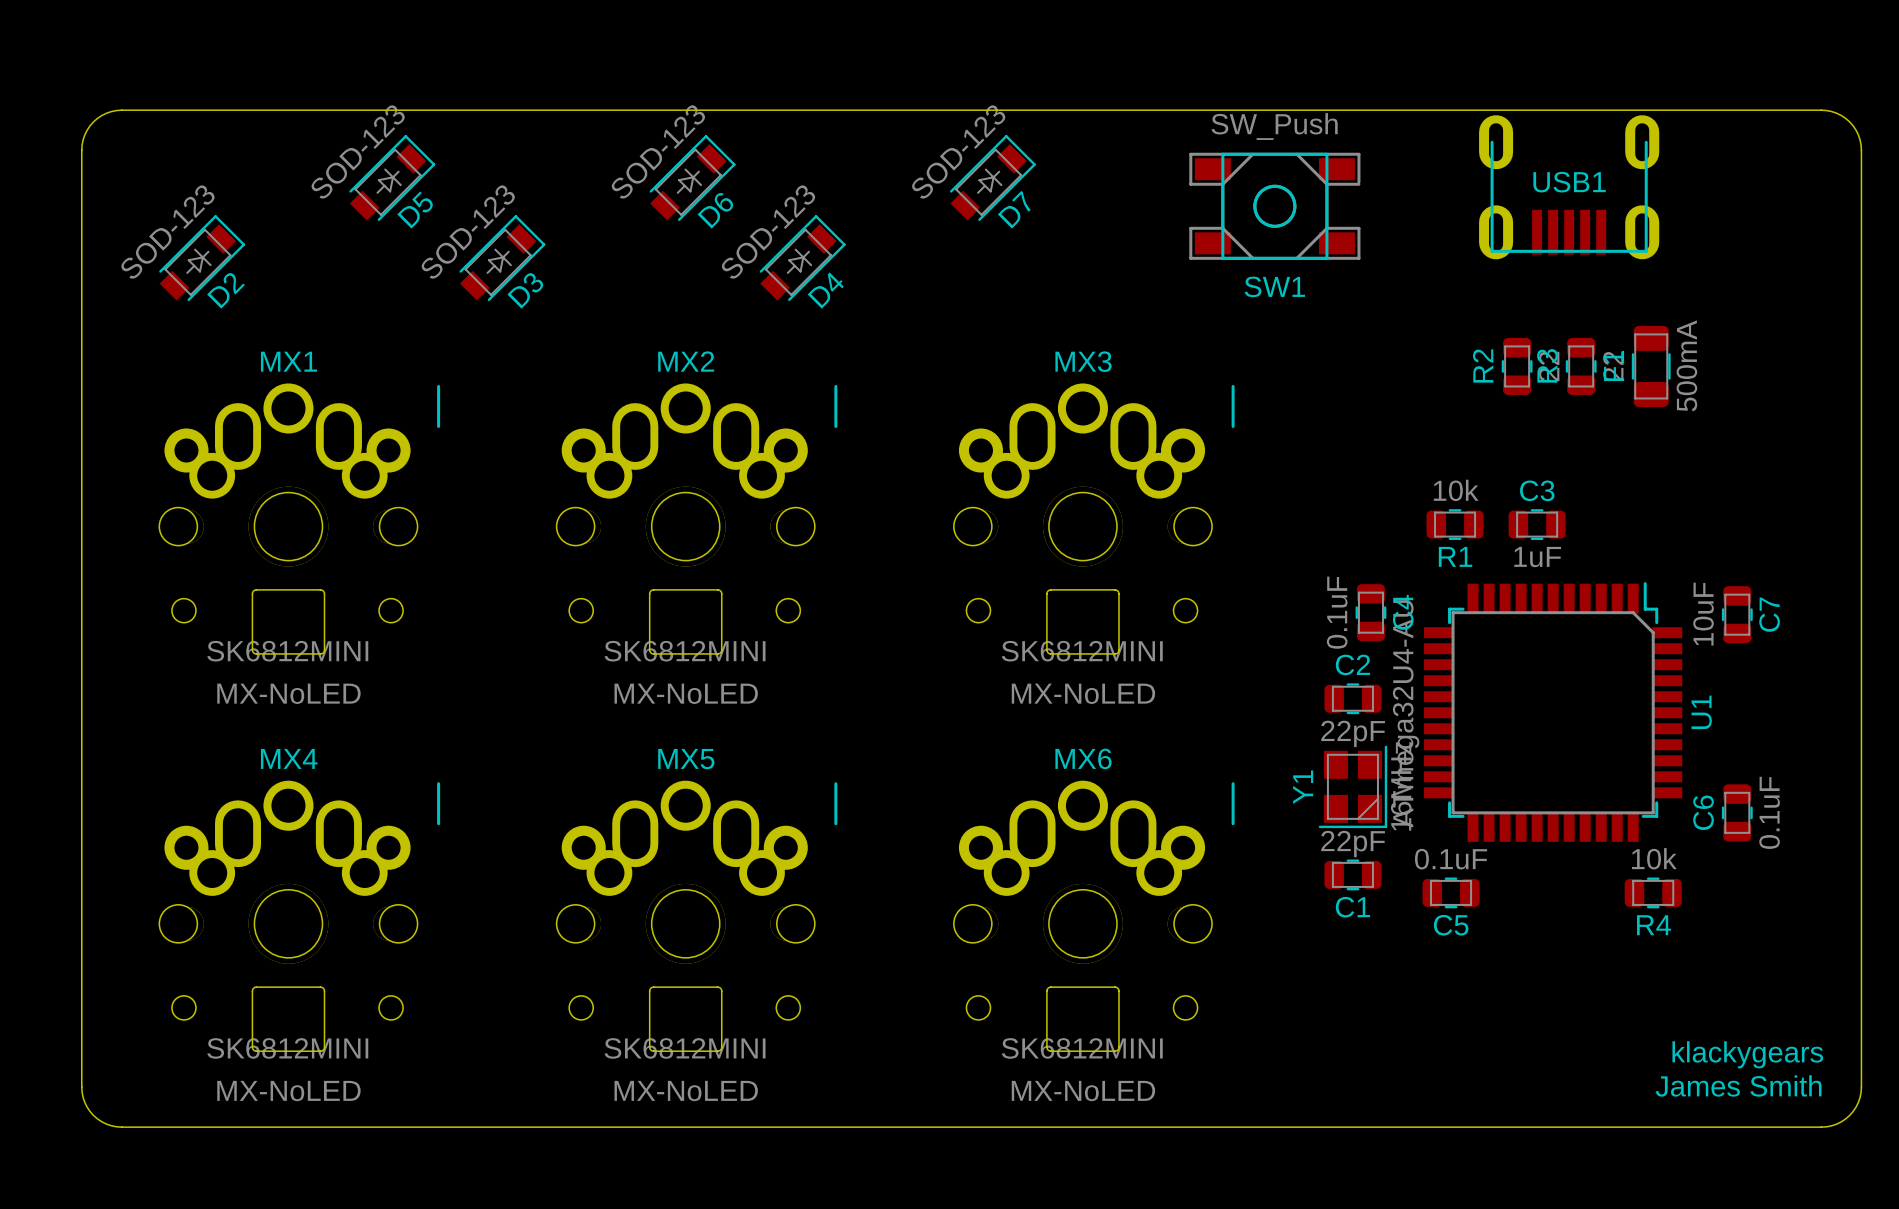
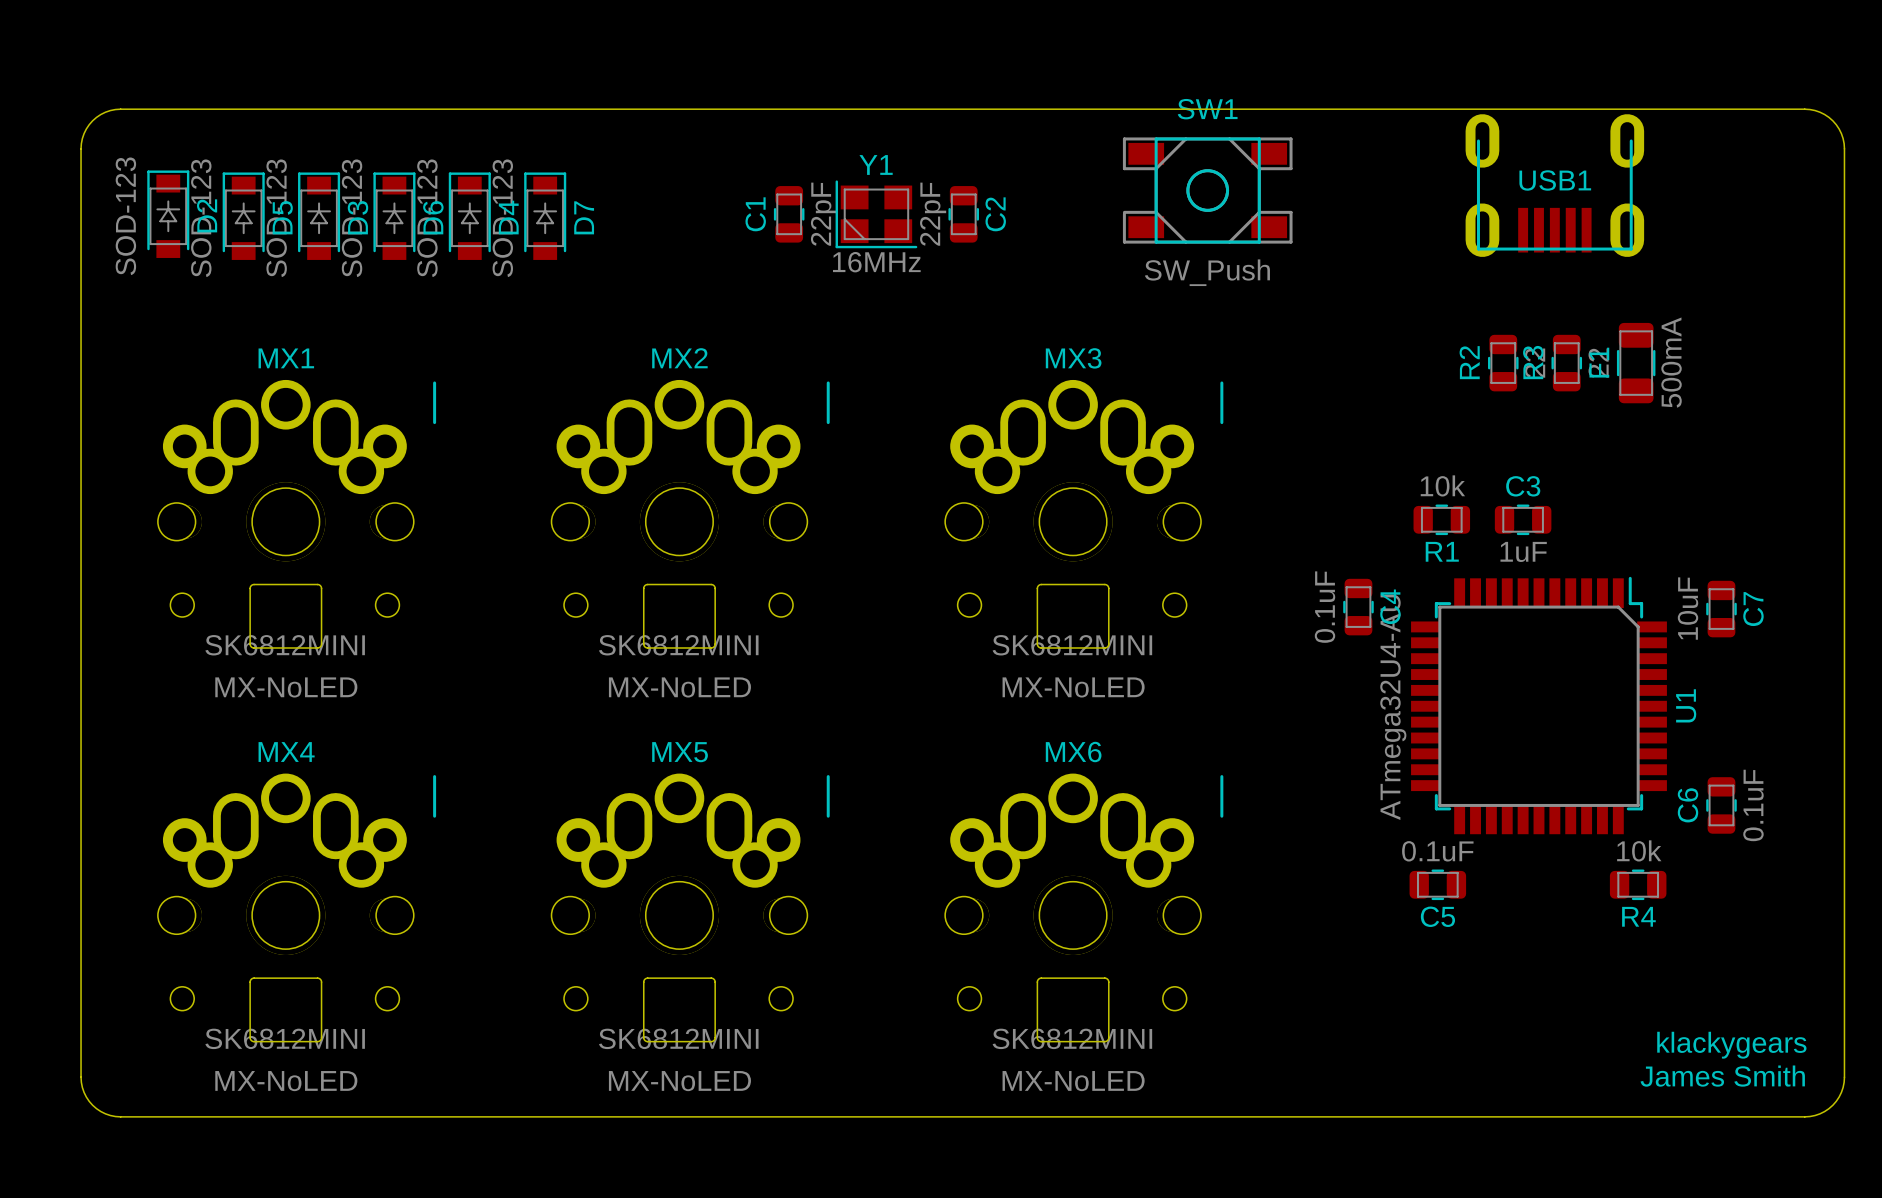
D5 rotation: 0° (392, 178) -> 45° counterclockwise (243, 216)
D5 position: (392, 178) -> (243, 216)
D6 rotation: 0° (692, 178) -> 45° counterclockwise (394, 216)
D6 position: (692, 178) -> (394, 216)
D7 rotation: 0° (992, 178) -> 45° counterclockwise (545, 216)
D7 position: (992, 178) -> (545, 216)
SW1 rotation: 0° (1274, 206) -> 180° (1207, 190)
D2 rotation: 0° (202, 258) -> 45° counterclockwise (168, 214)
D2 position: (202, 258) -> (168, 214)
D3 rotation: 0° (502, 258) -> 45° counterclockwise (319, 216)
D3 position: (502, 258) -> (319, 216)
D4 rotation: 0° (802, 258) -> 45° counterclockwise (469, 216)
D4 position: (802, 258) -> (469, 216)
C2 rotation: 0° (1352, 698) -> 90° clockwise (963, 214)
C2 position: (1352, 698) -> (963, 214)
Y1 rotation: 0° (1352, 786) -> 90° clockwise (876, 214)
Y1 position: (1352, 786) -> (876, 214)
C1 rotation: 0° (1352, 874) -> 90° clockwise (789, 214)
C1 position: (1352, 874) -> (789, 214)

